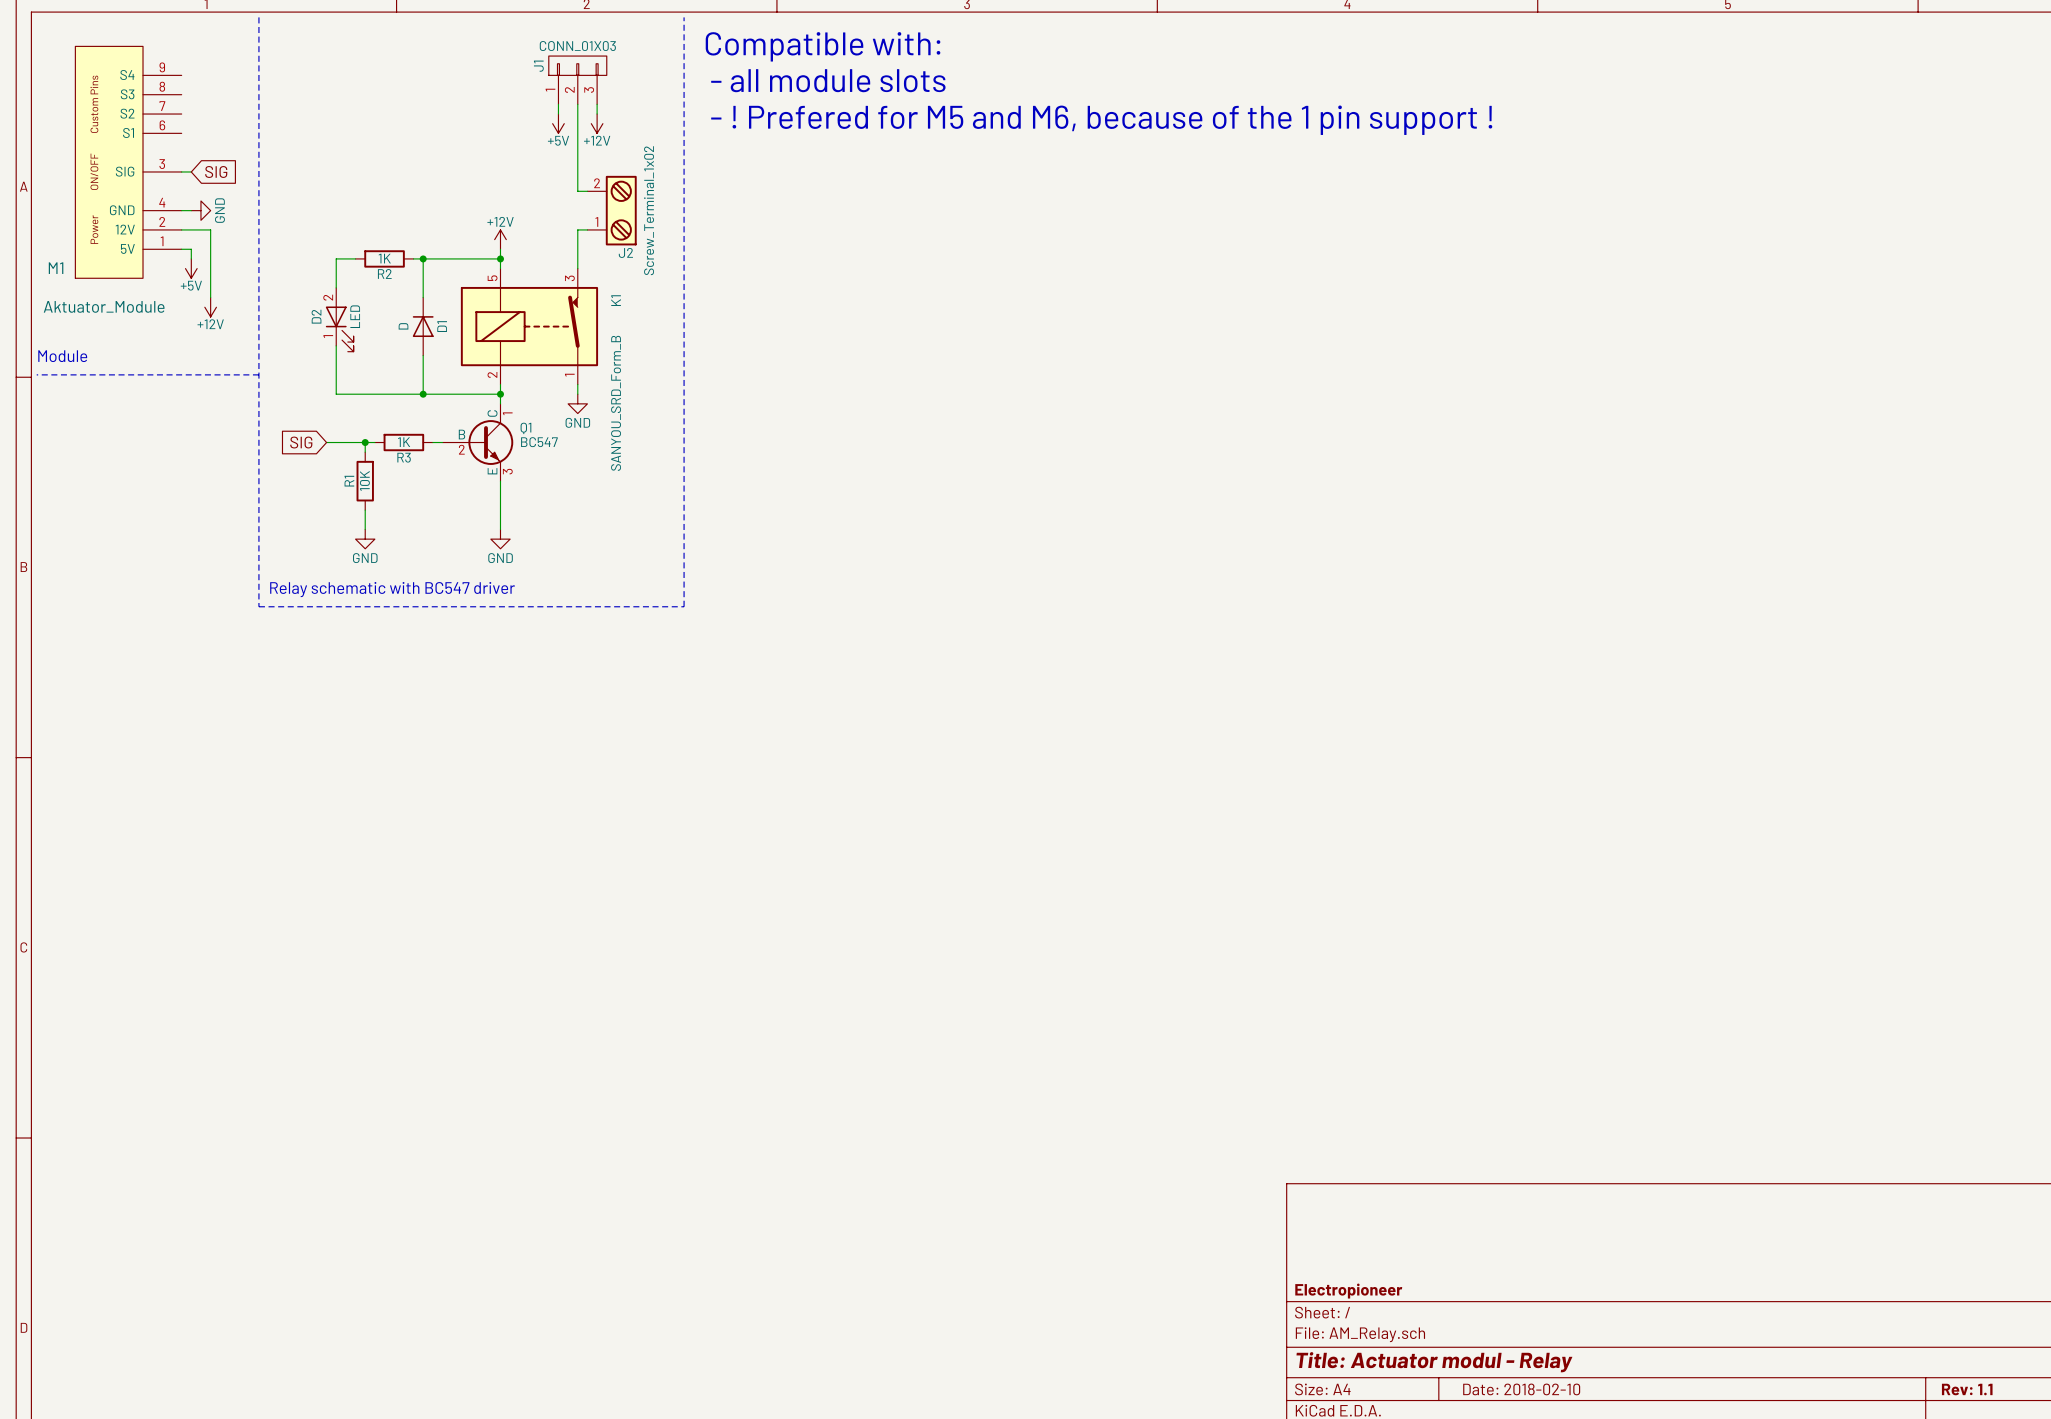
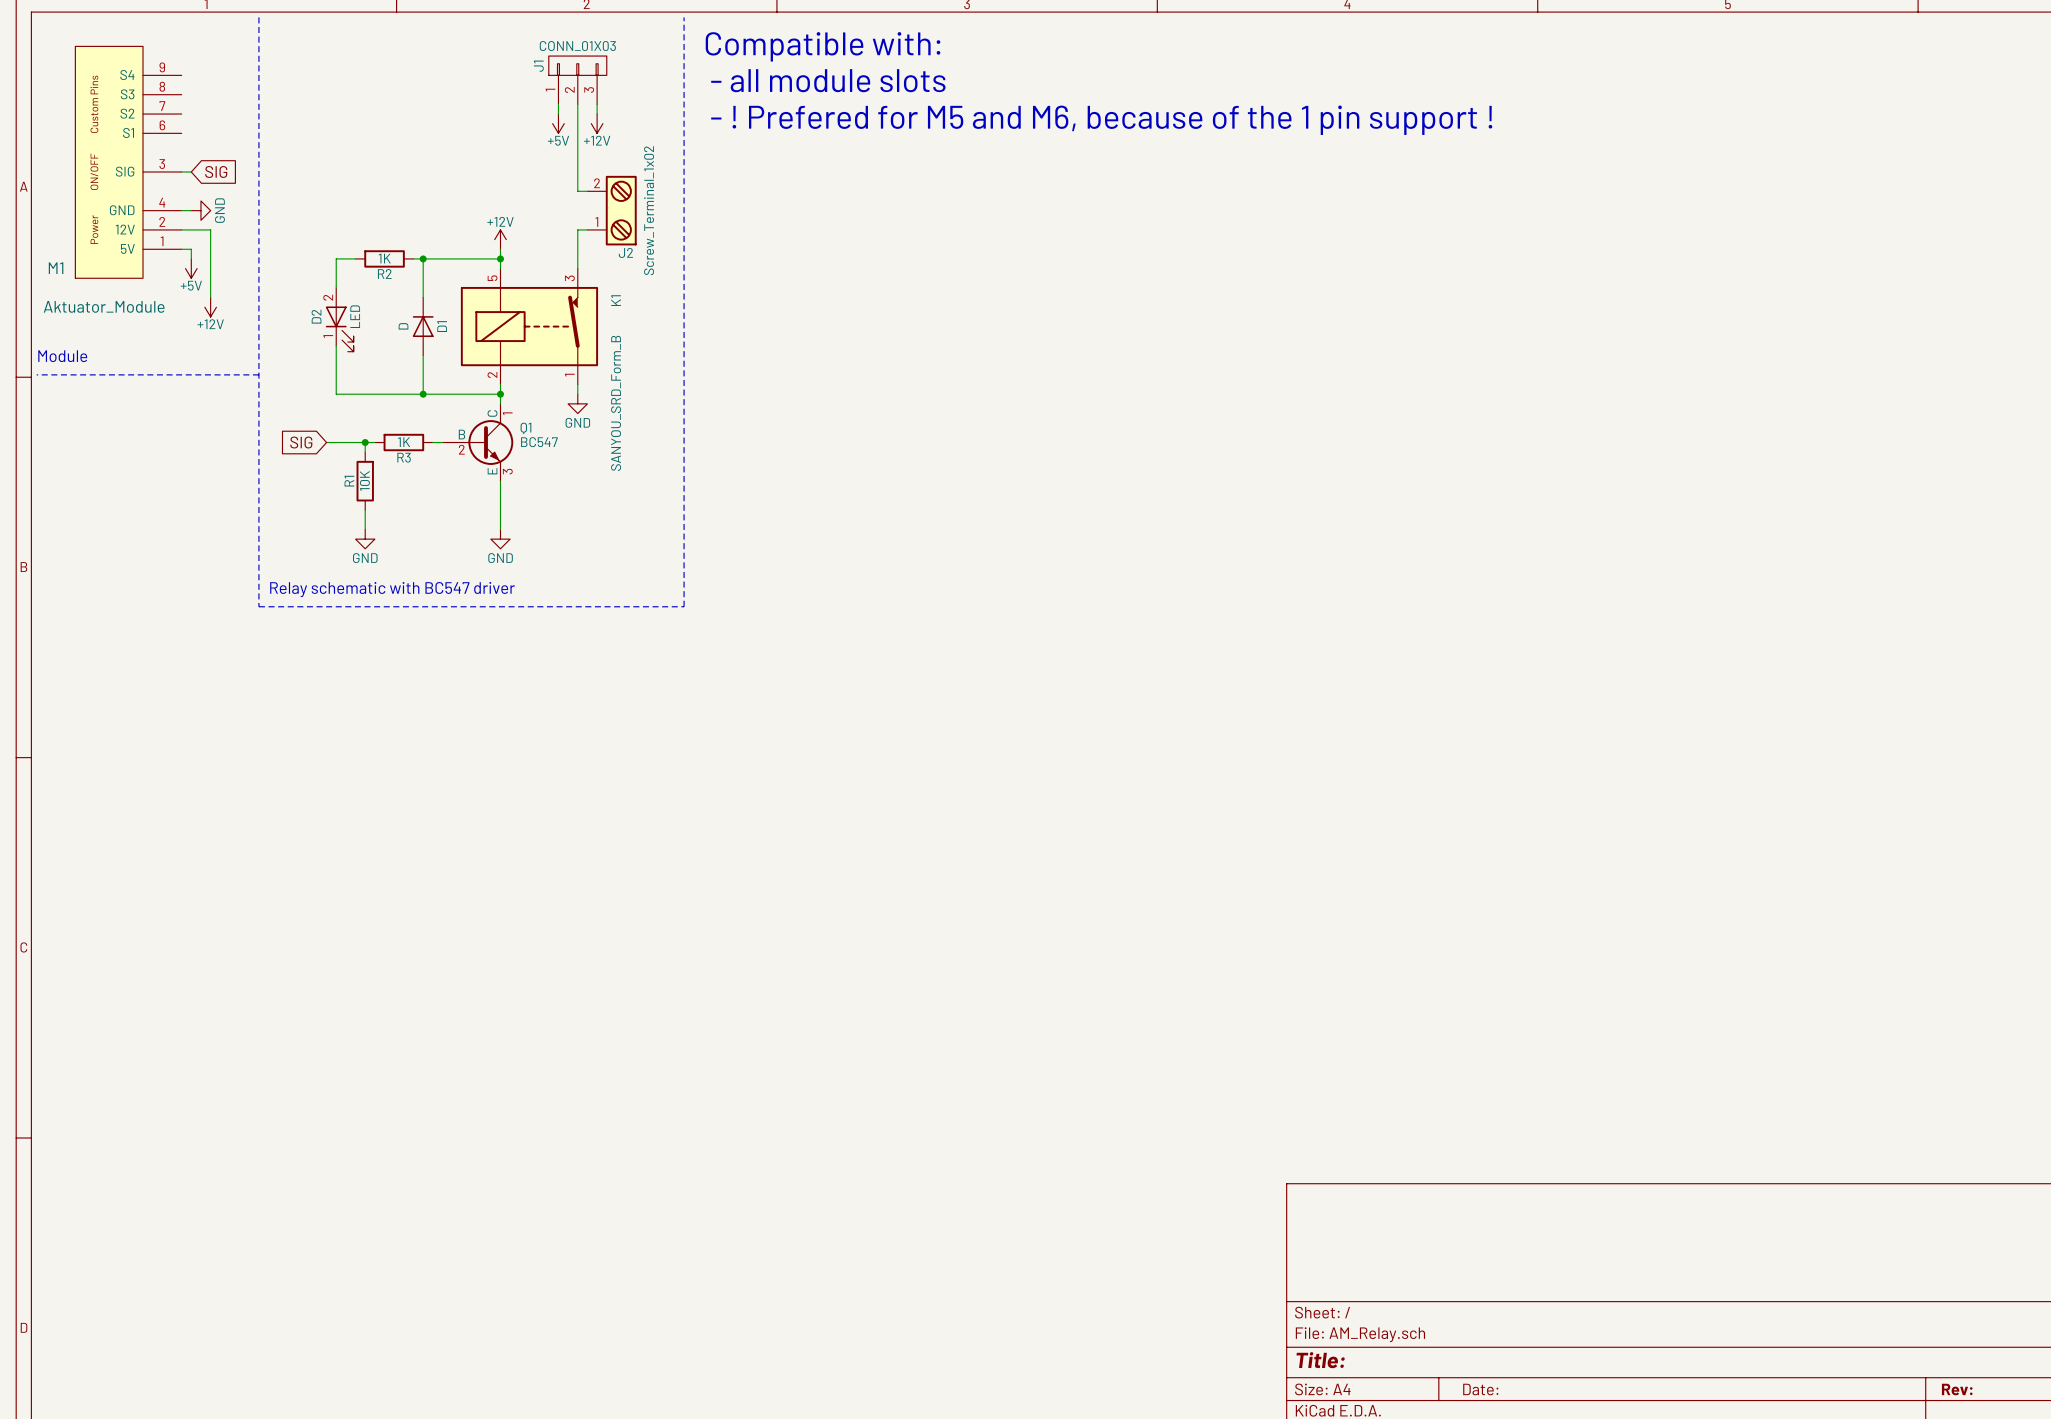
title block: Electropioneer (1348, 1291) -> none
title block: Title: Actuator modul - Relay (1434, 1362) -> Title: (1320, 1360)
title block: Date: 2018-02-10 (1521, 1389) -> Date: (1480, 1389)
title block: Rev: 1.1 (1967, 1389) -> Rev: (1957, 1389)

